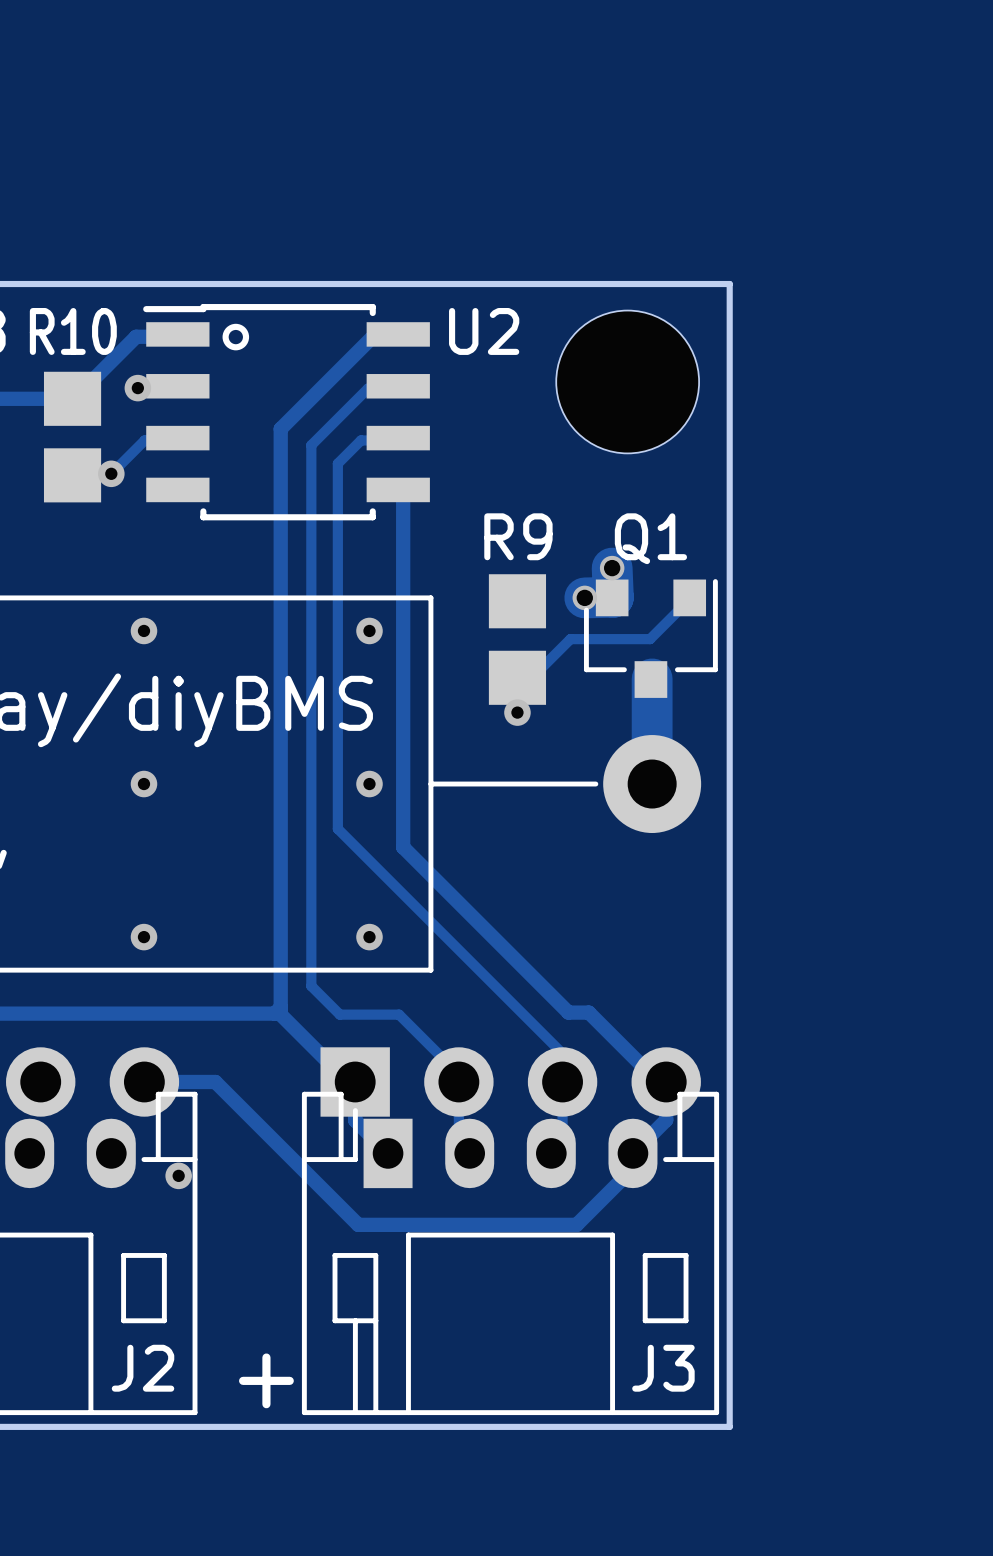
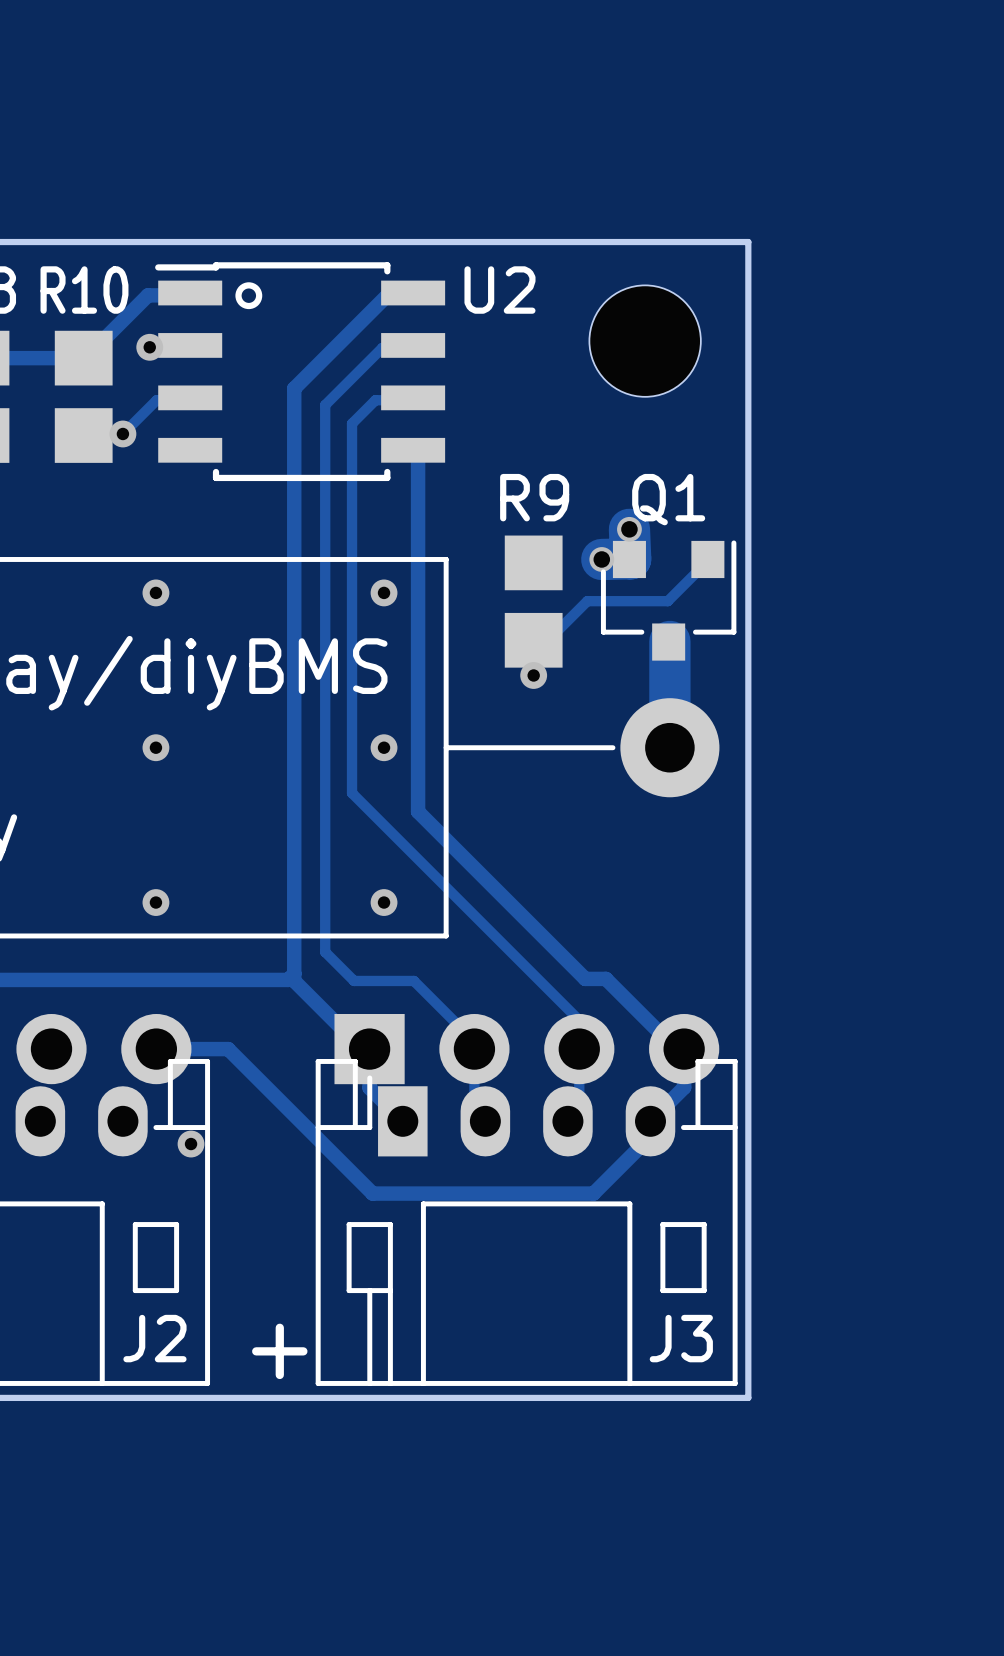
part footprint: [556, 310, 700, 454] -> [589, 285, 701, 397]

